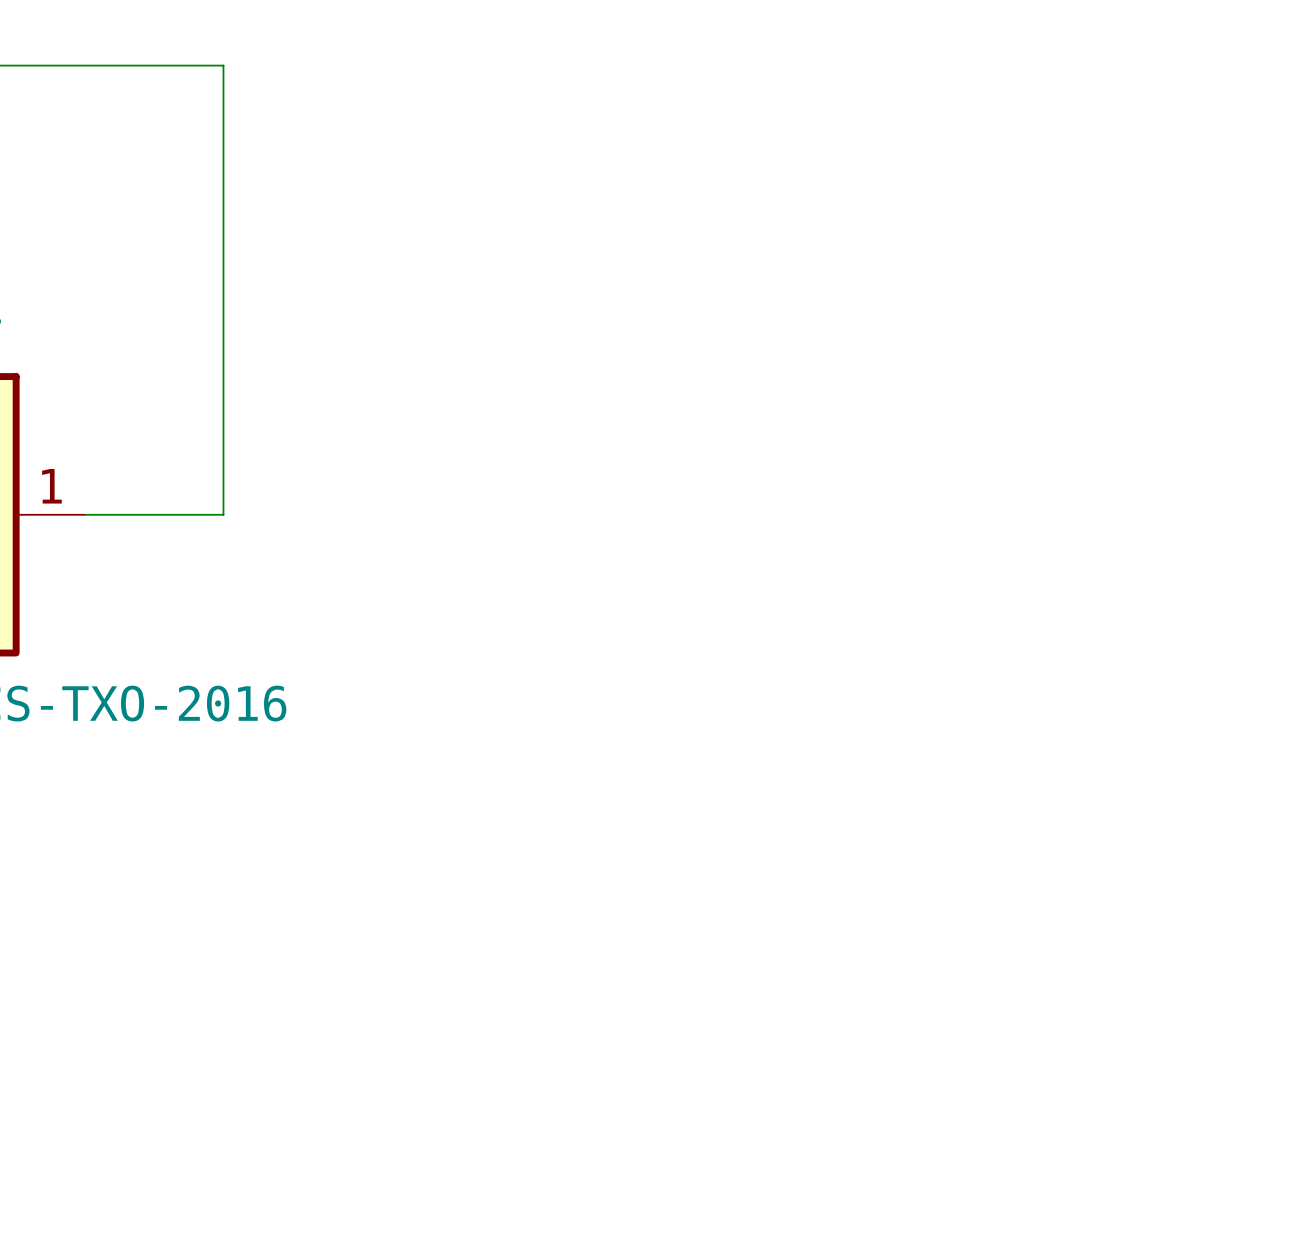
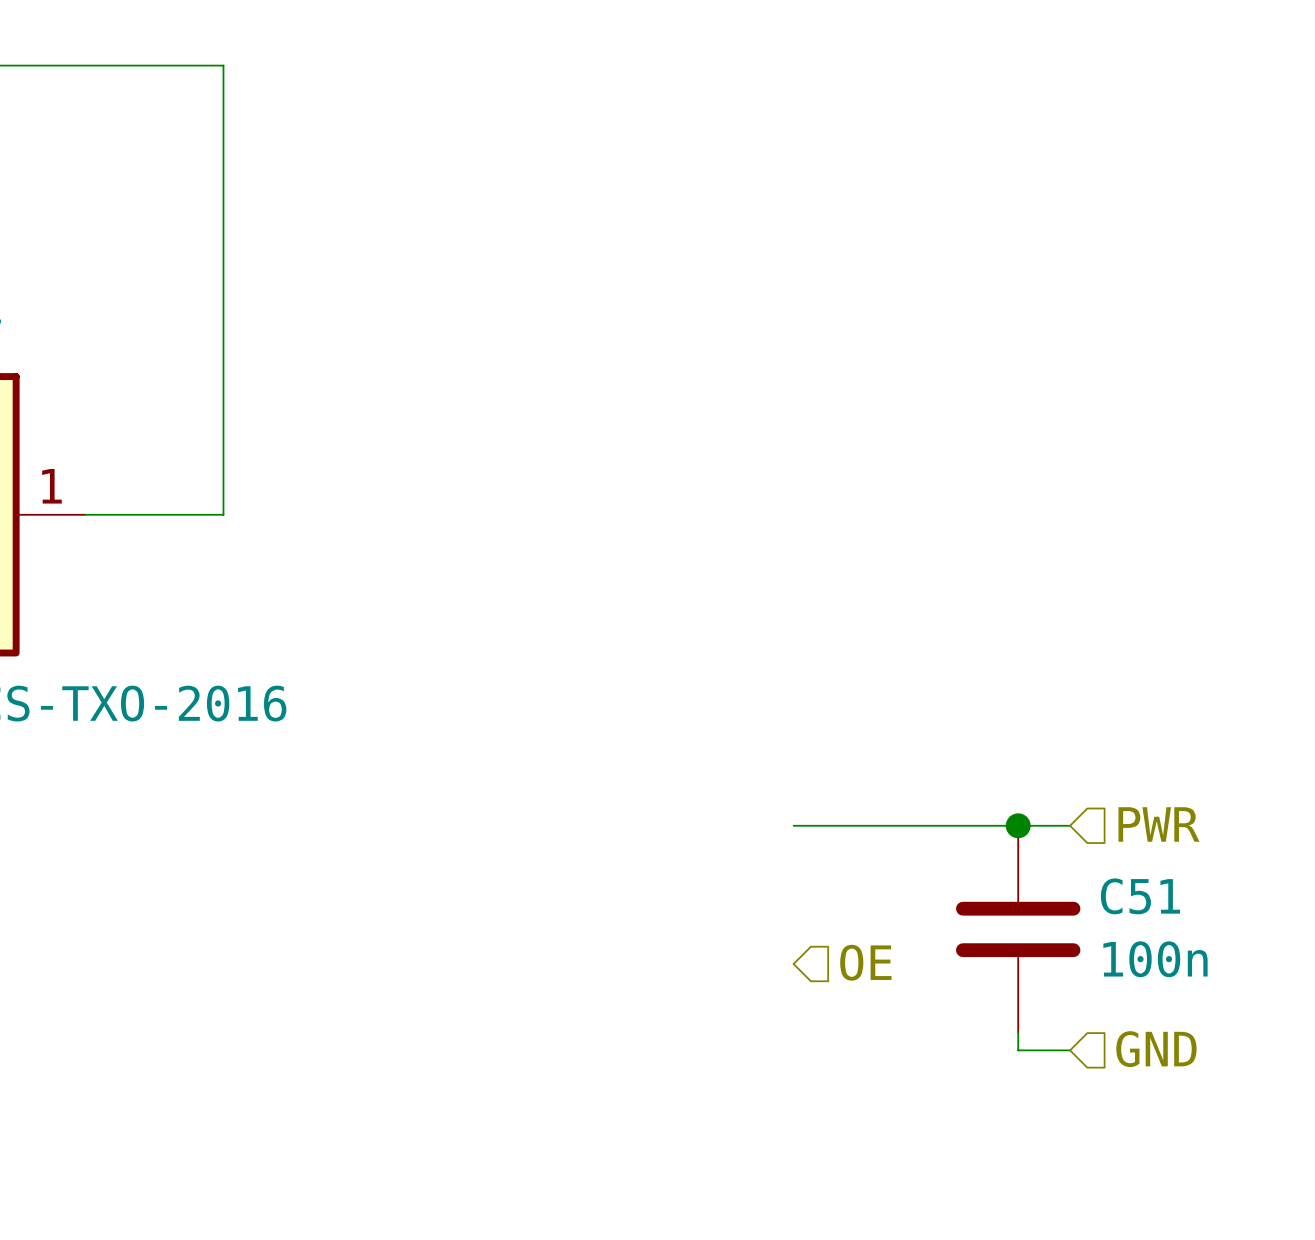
hierarchical label: none -> PWR (1159, 824)
wire: none -> (793, 825) (1070, 825)
junction: none -> (1018, 825)
C51: none -> 100n (1018, 929)
hierarchical label: none -> OE (865, 962)
wire: none -> (1018, 1033) (1018, 1050) (1070, 1050)
hierarchical label: none -> GND (1156, 1049)

